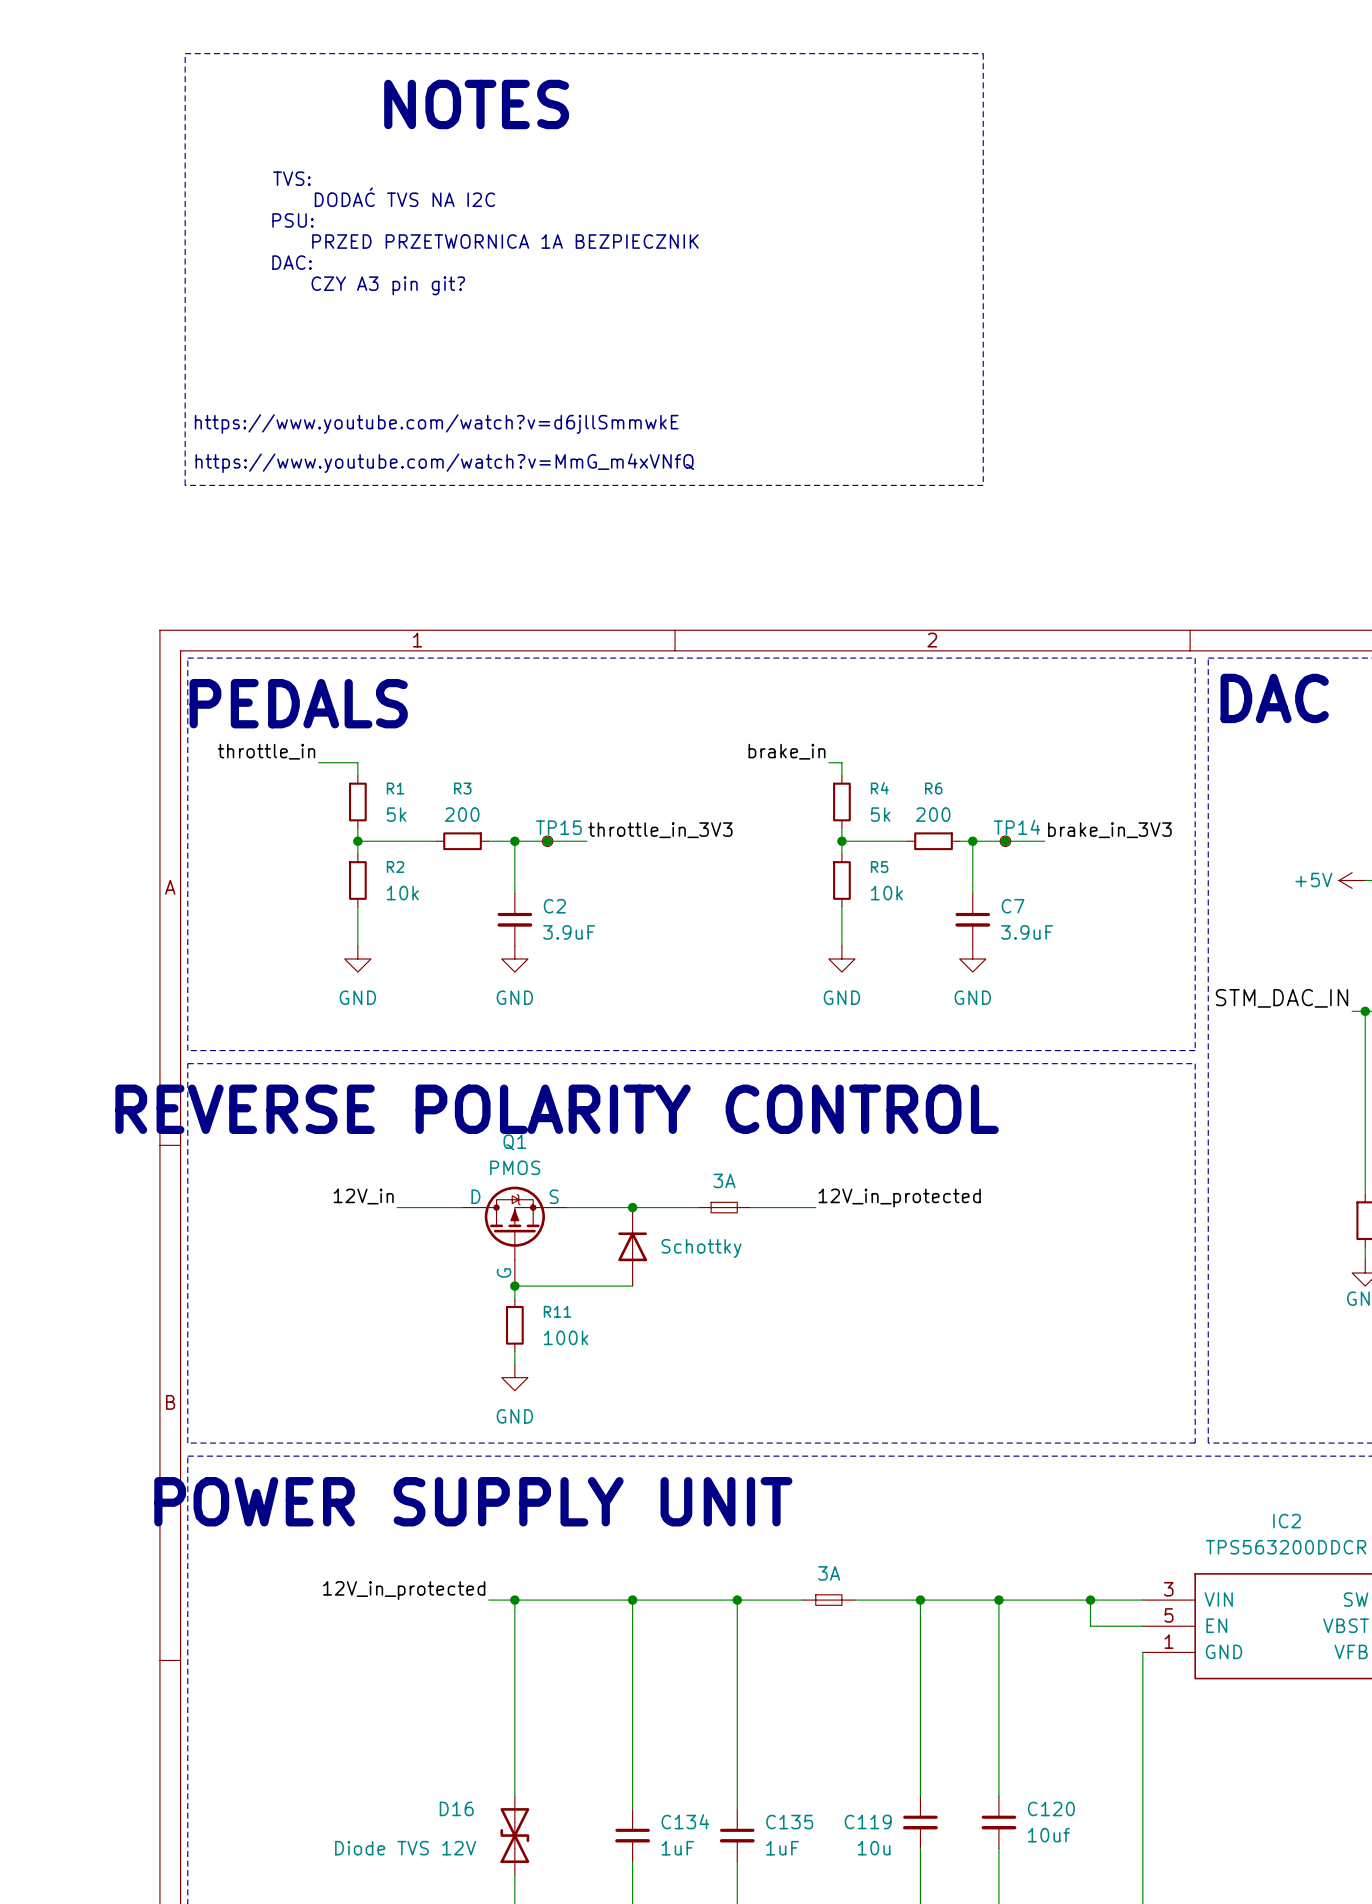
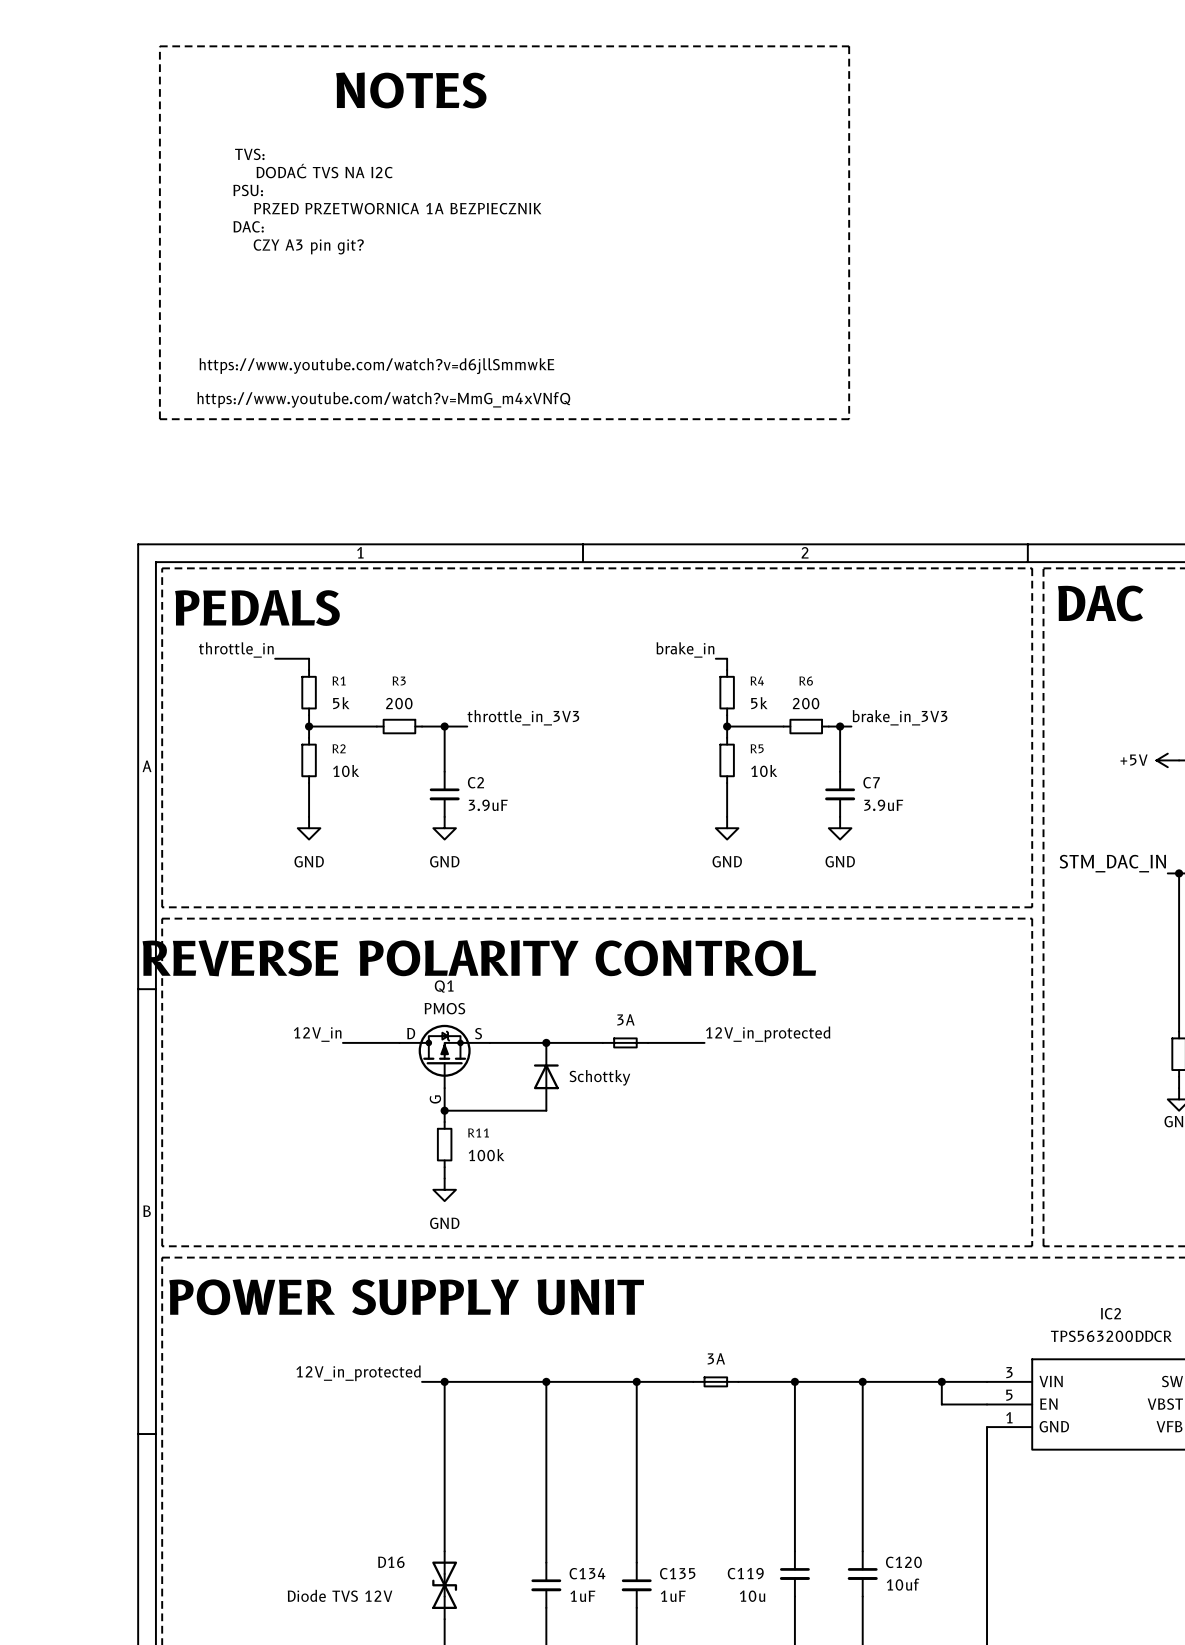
label position: throttle_in_3V3 (660, 830) -> throttle_in_3V3 (523, 717)
label position: brake_in_3V3 (1109, 830) -> brake_in_3V3 (900, 717)
wire: (541, 841) (586, 841) -> none
junction: (547, 841) -> none
TP15: (547, 841) -> none
wire: (985, 841) (1044, 841) -> none
junction: (1005, 841) -> none
TP14: (1005, 841) -> none

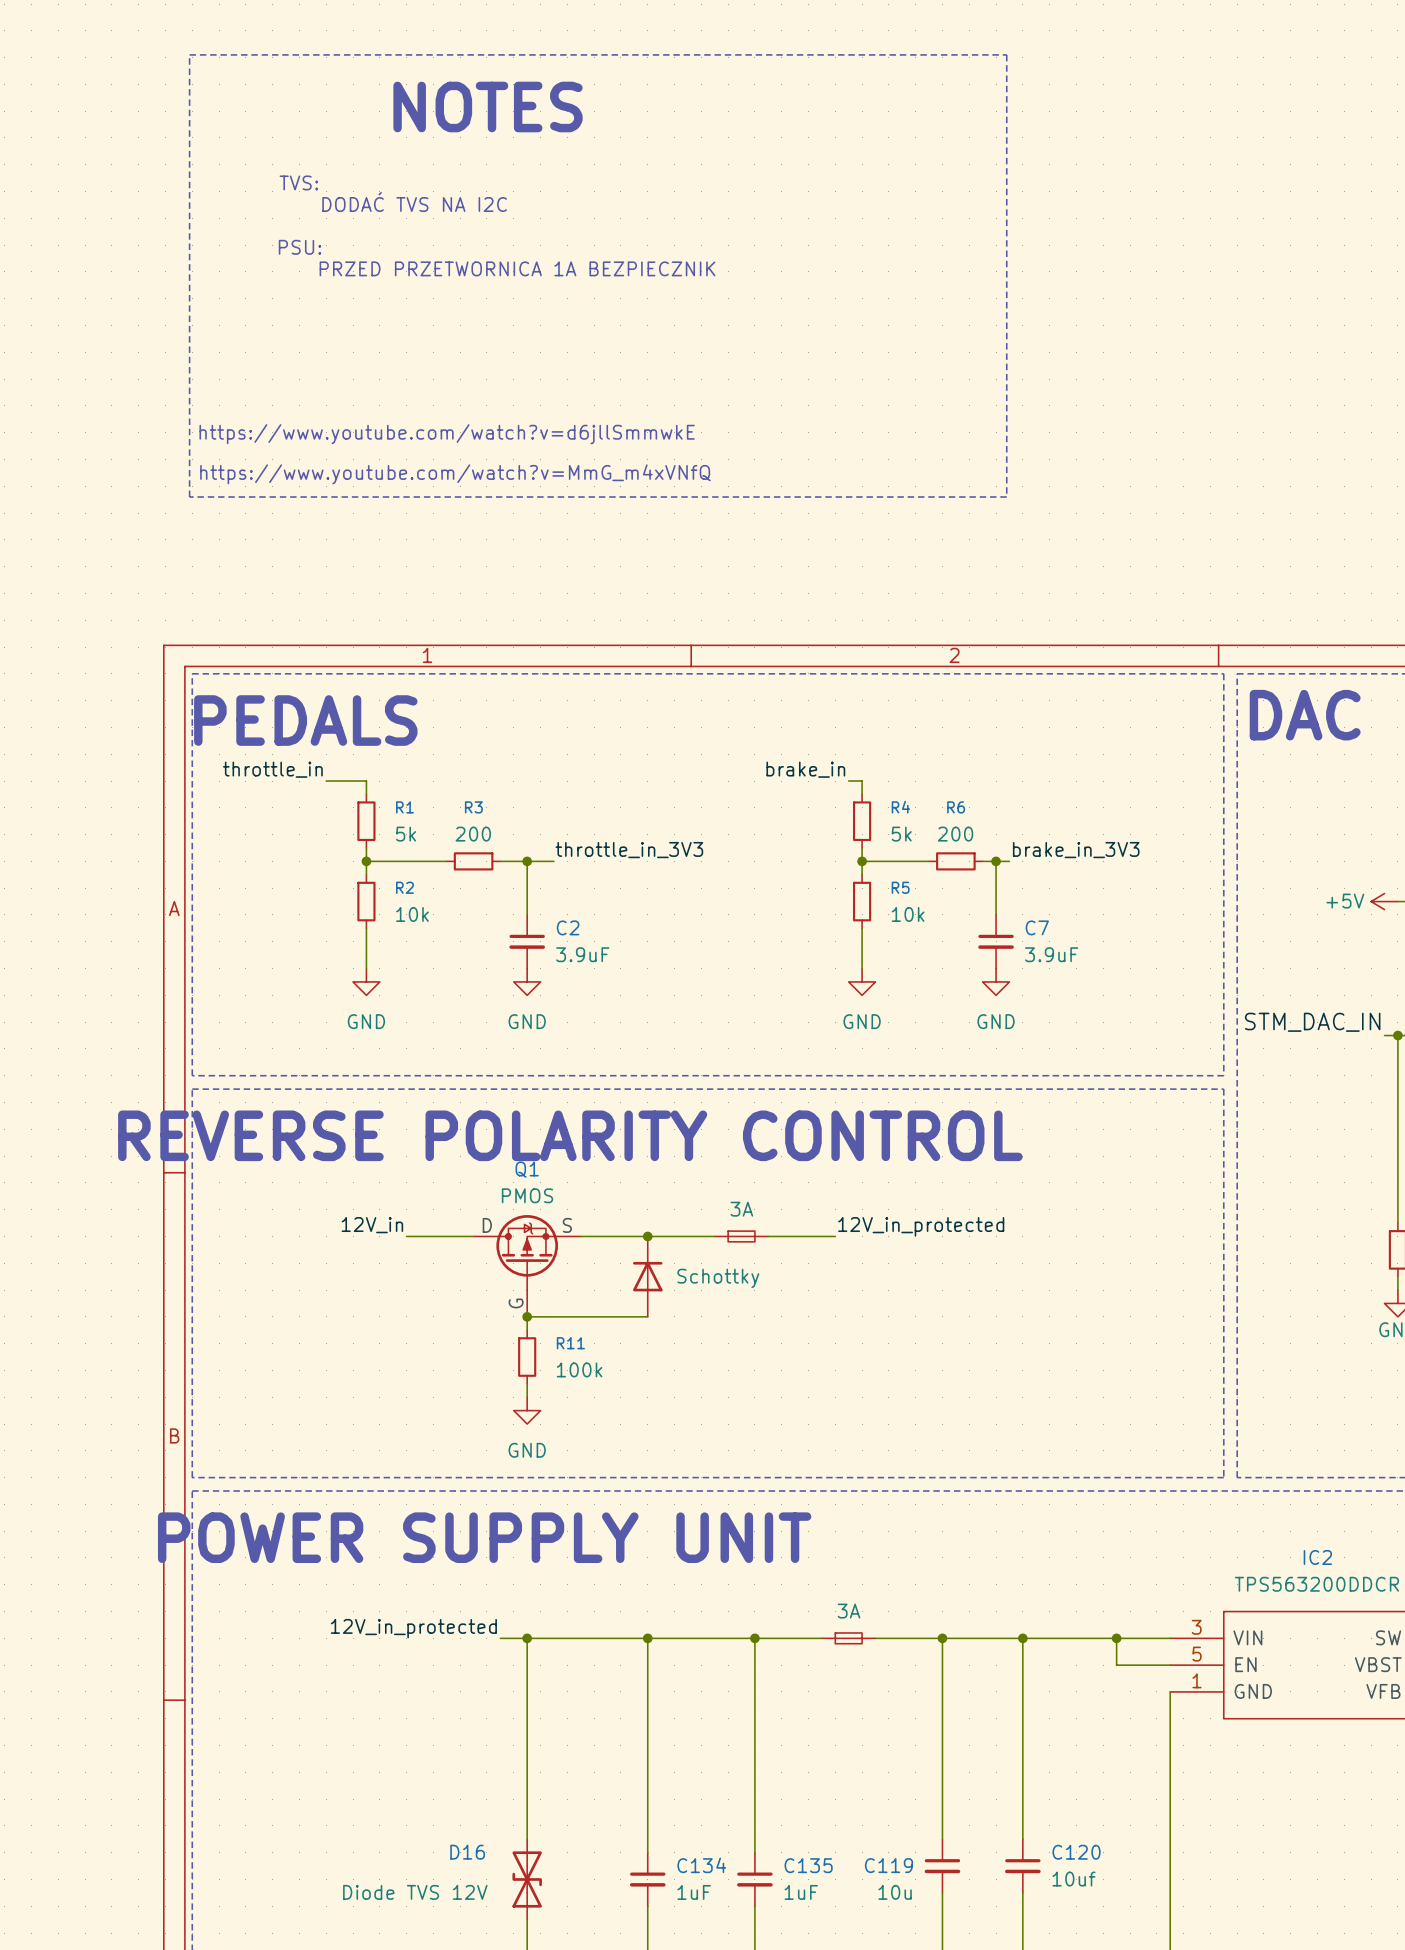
text: PSU: (248, 190) -> none
text: PRZED PRZETWORNICA 1A BEZPIECZNIK (397, 208) -> PSU: (299, 247)
text: DAC: (248, 226) -> PRZED PRZETWORNICA 1A BEZPIECZNIK (517, 268)
text: CZY A3 pin git? (308, 246) -> none

